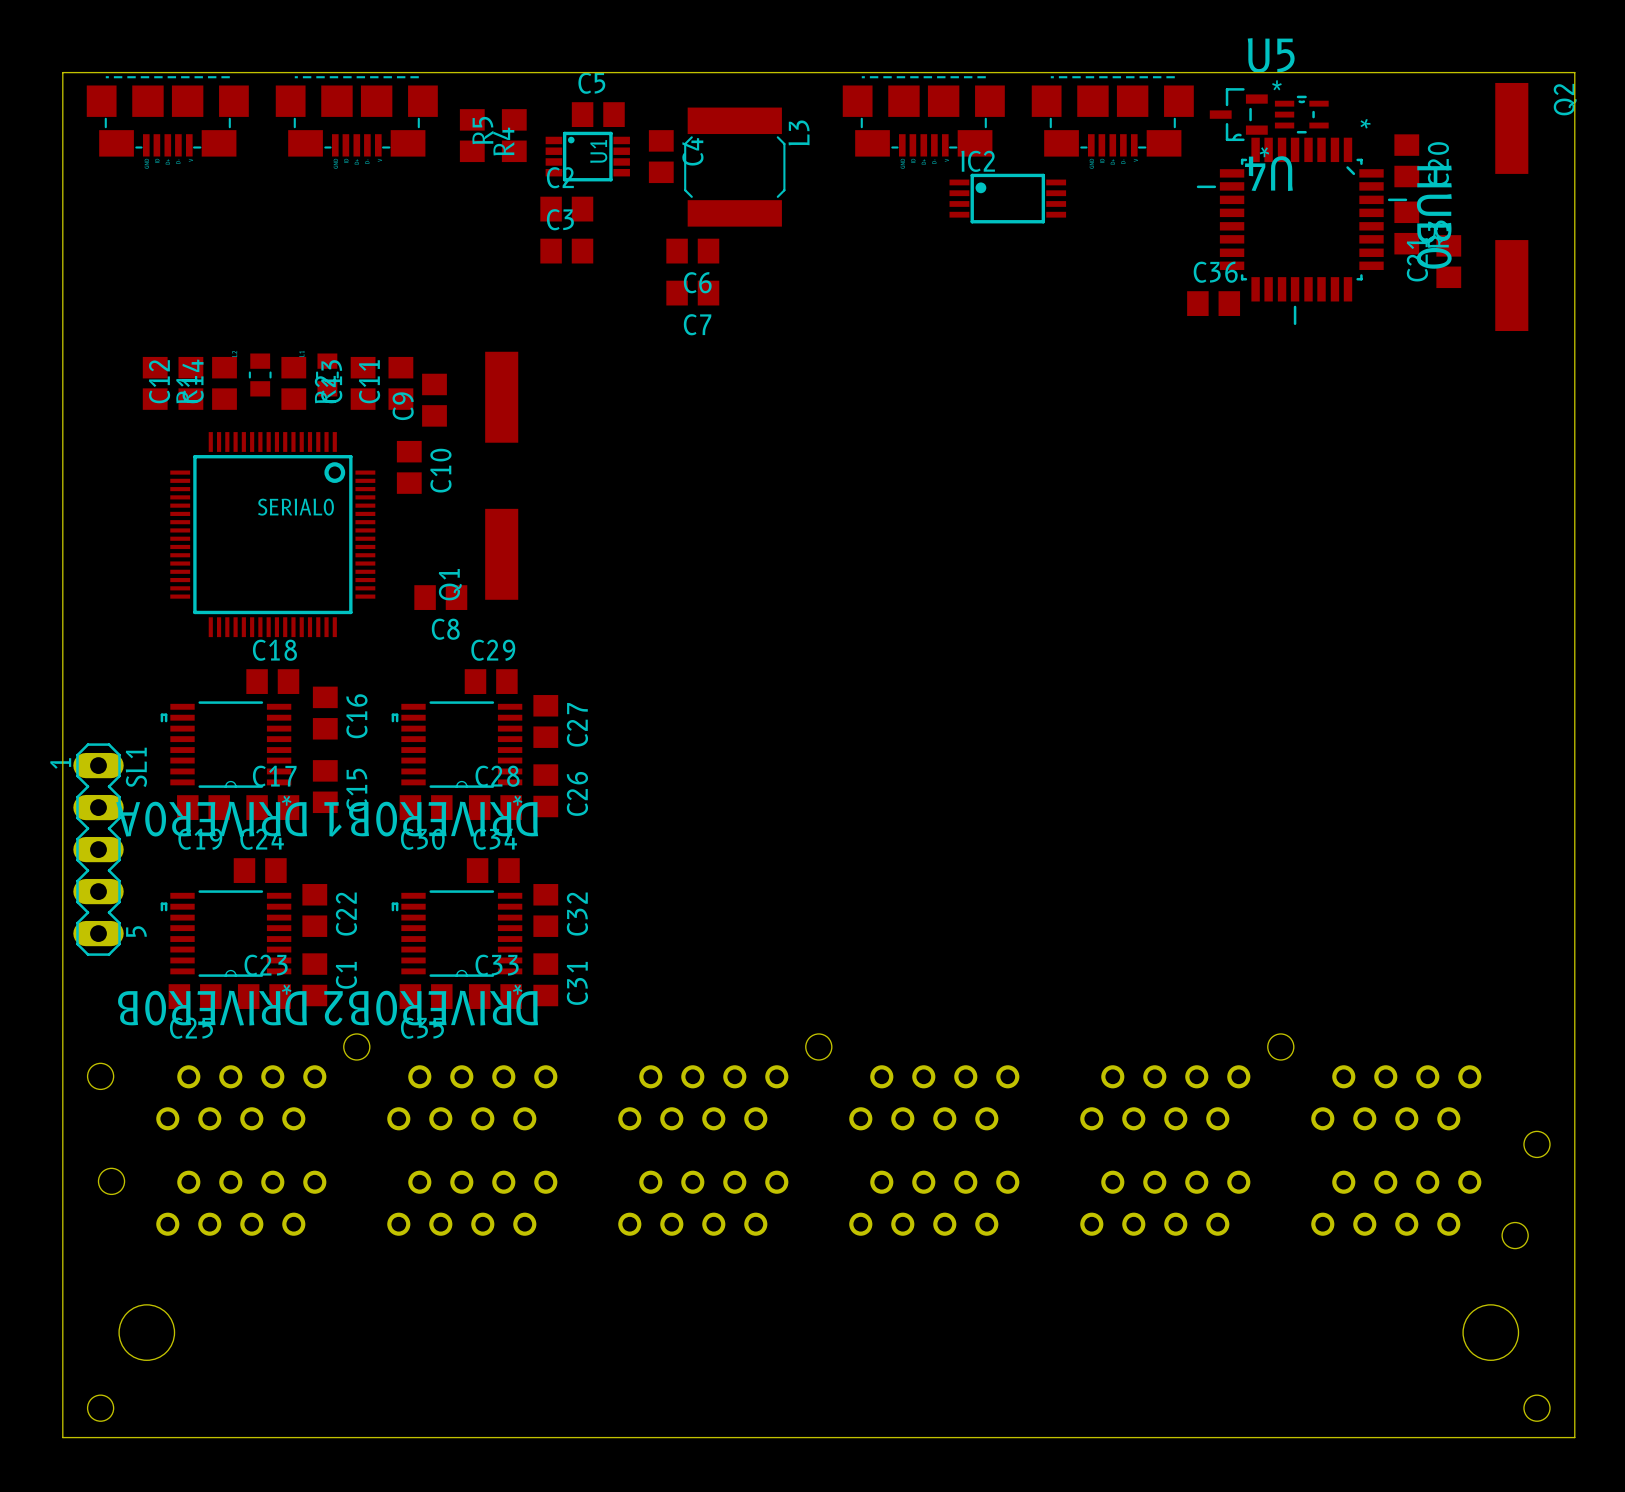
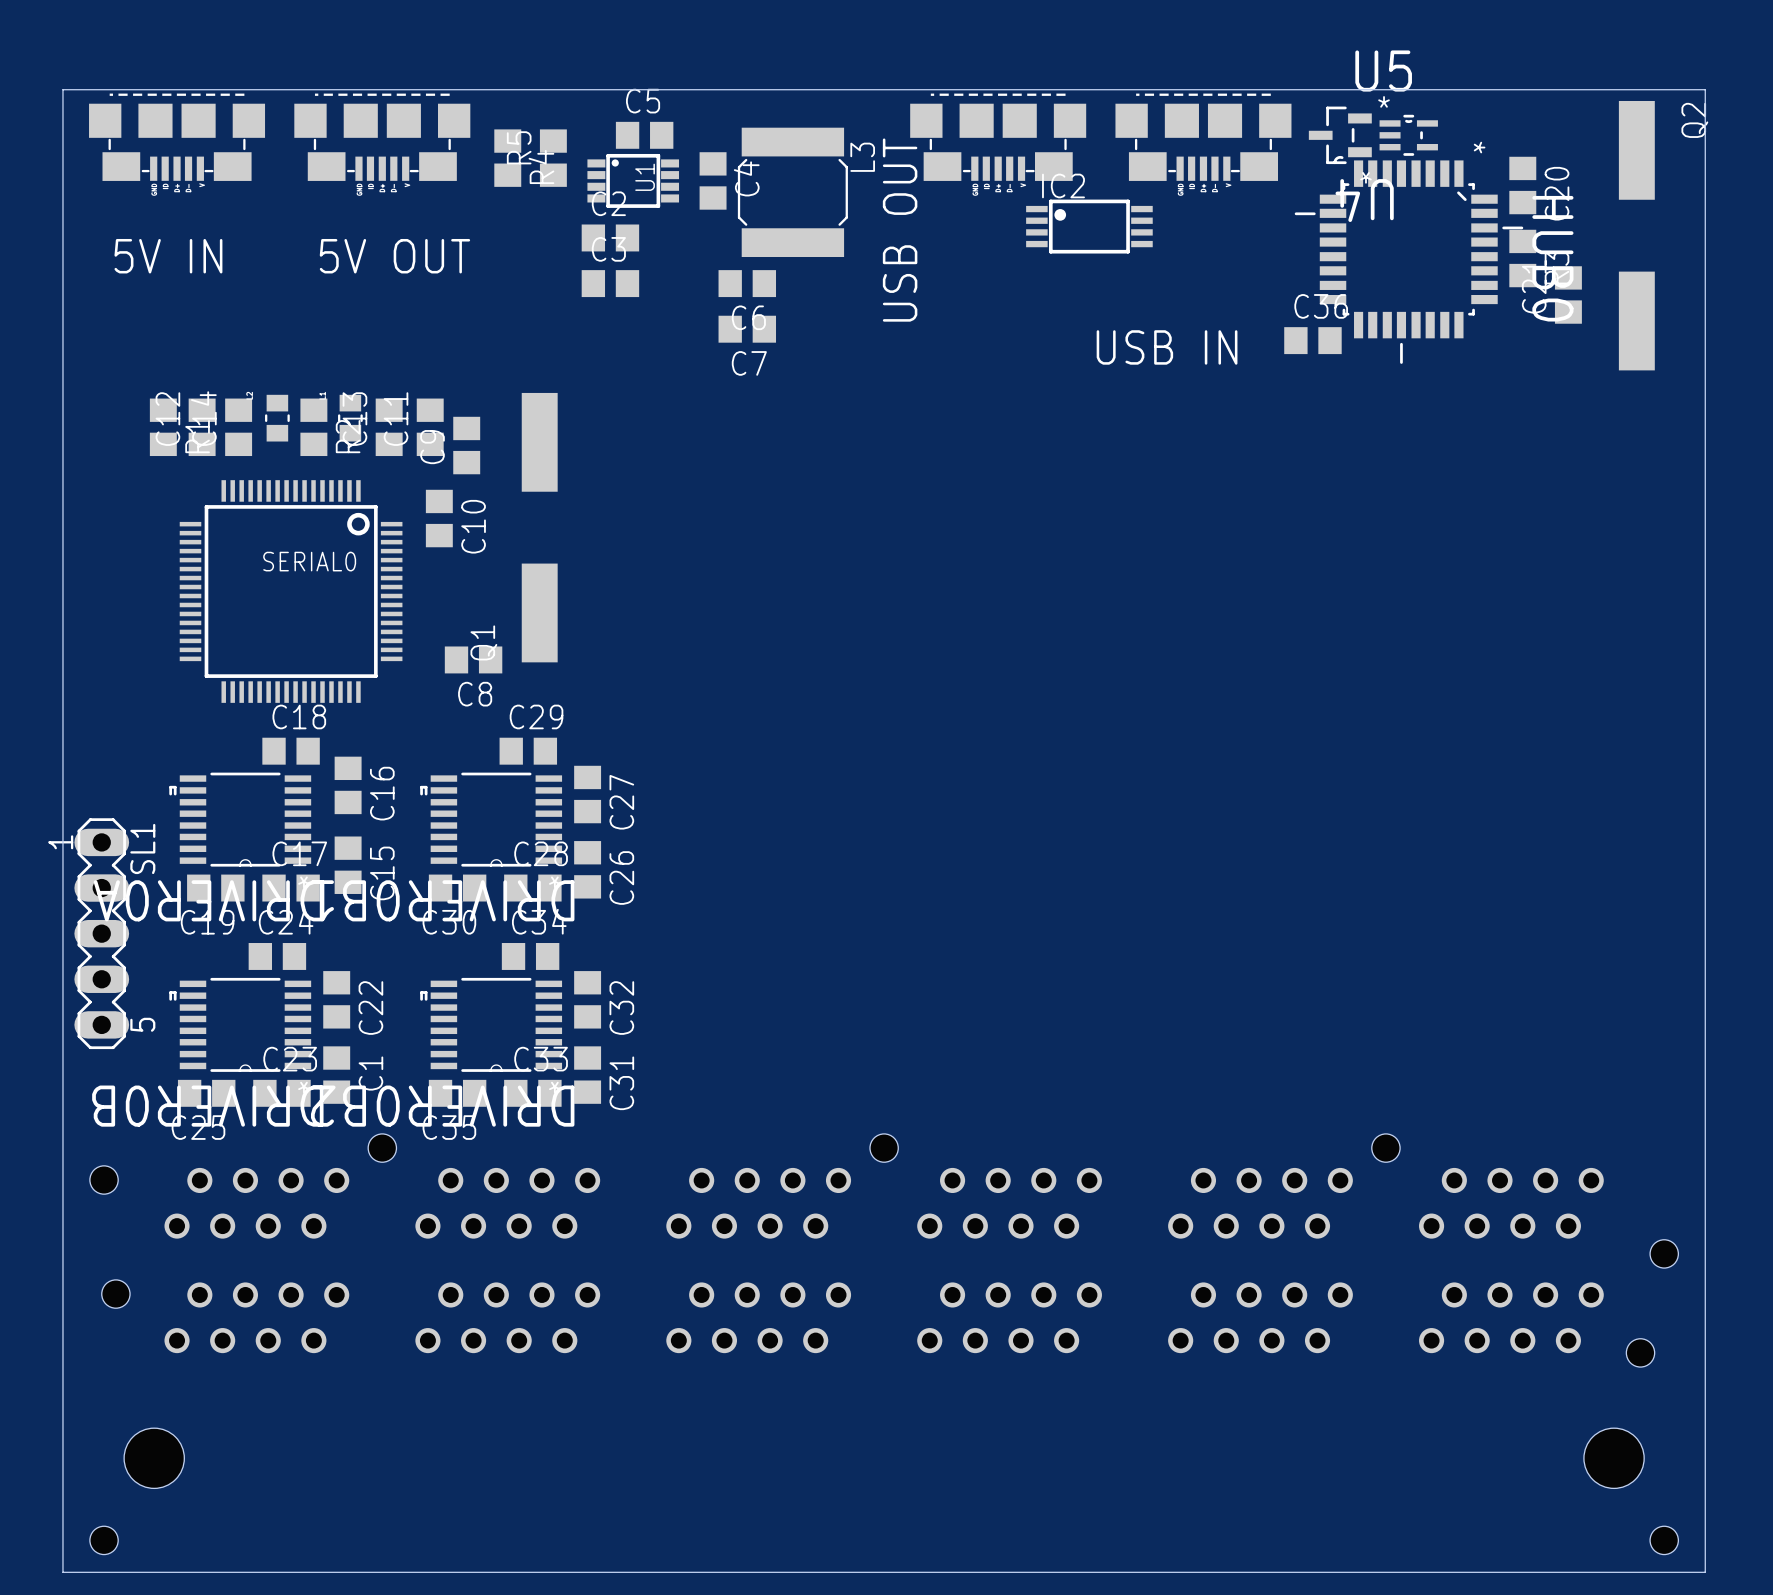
text: none -> USB OUT (900, 230)
text: none -> 5V IN (168, 256)
text: none -> 5V OUT (394, 256)
text: none -> USB IN (1167, 347)

